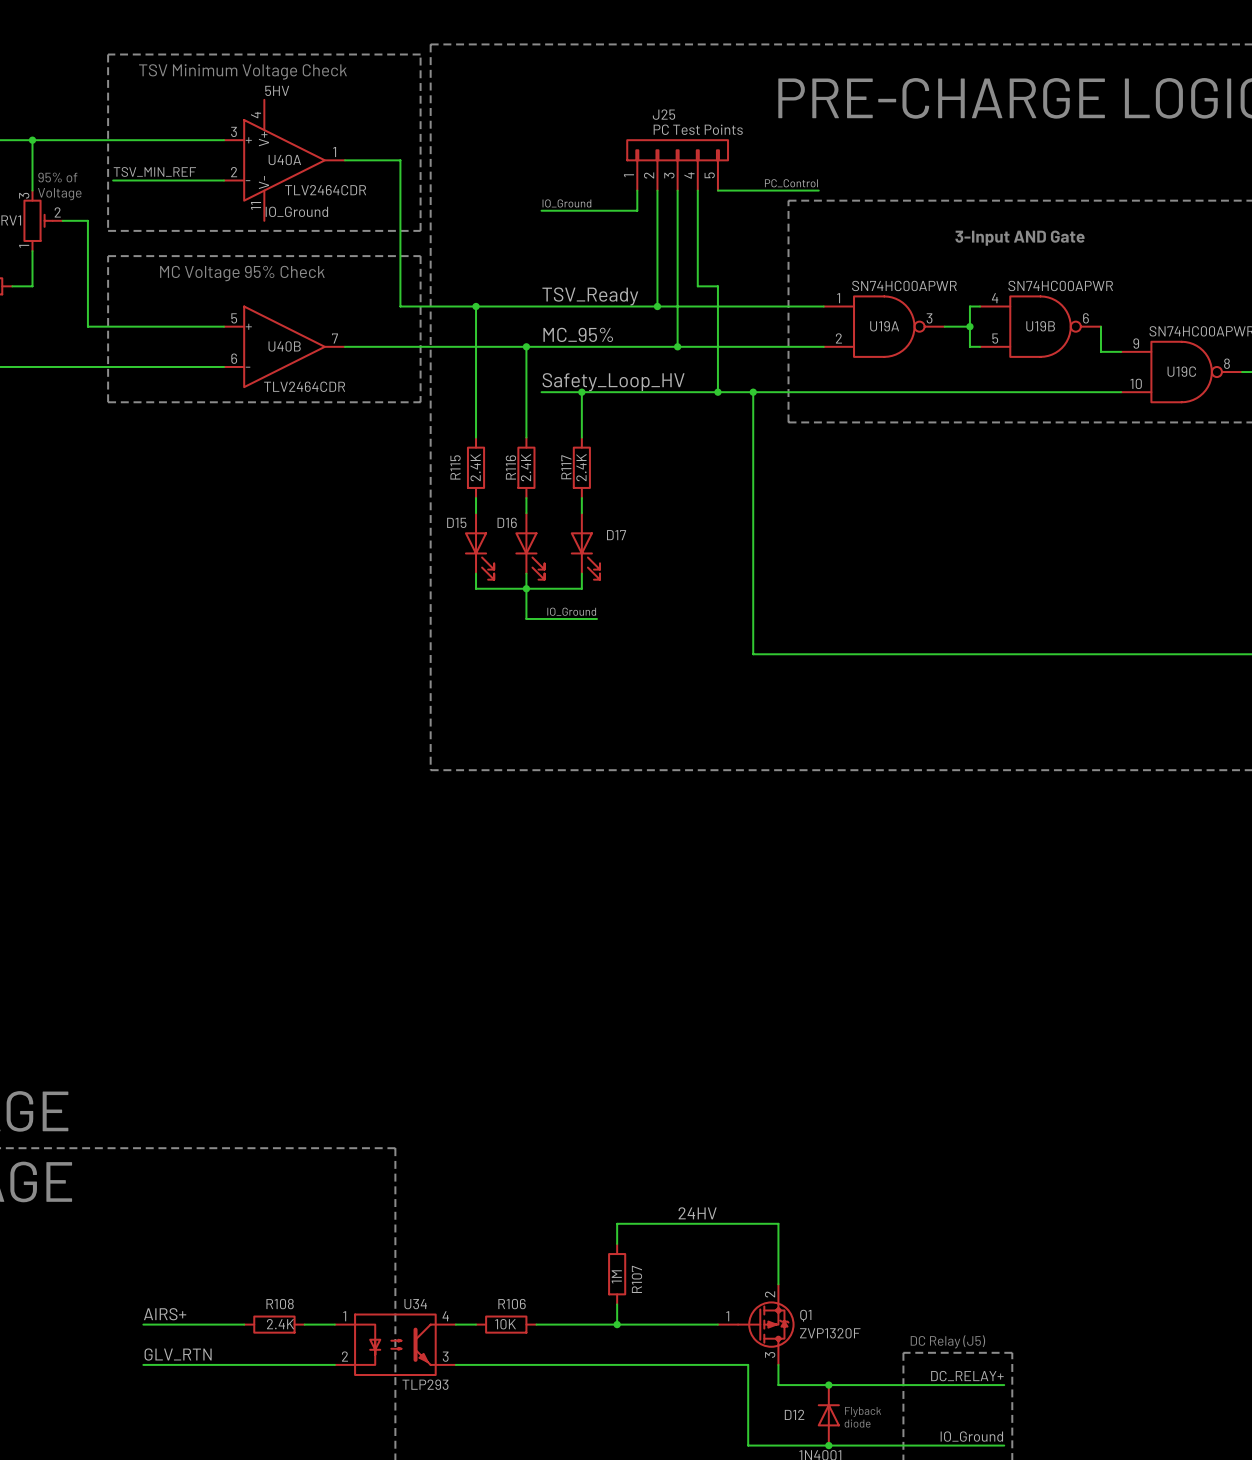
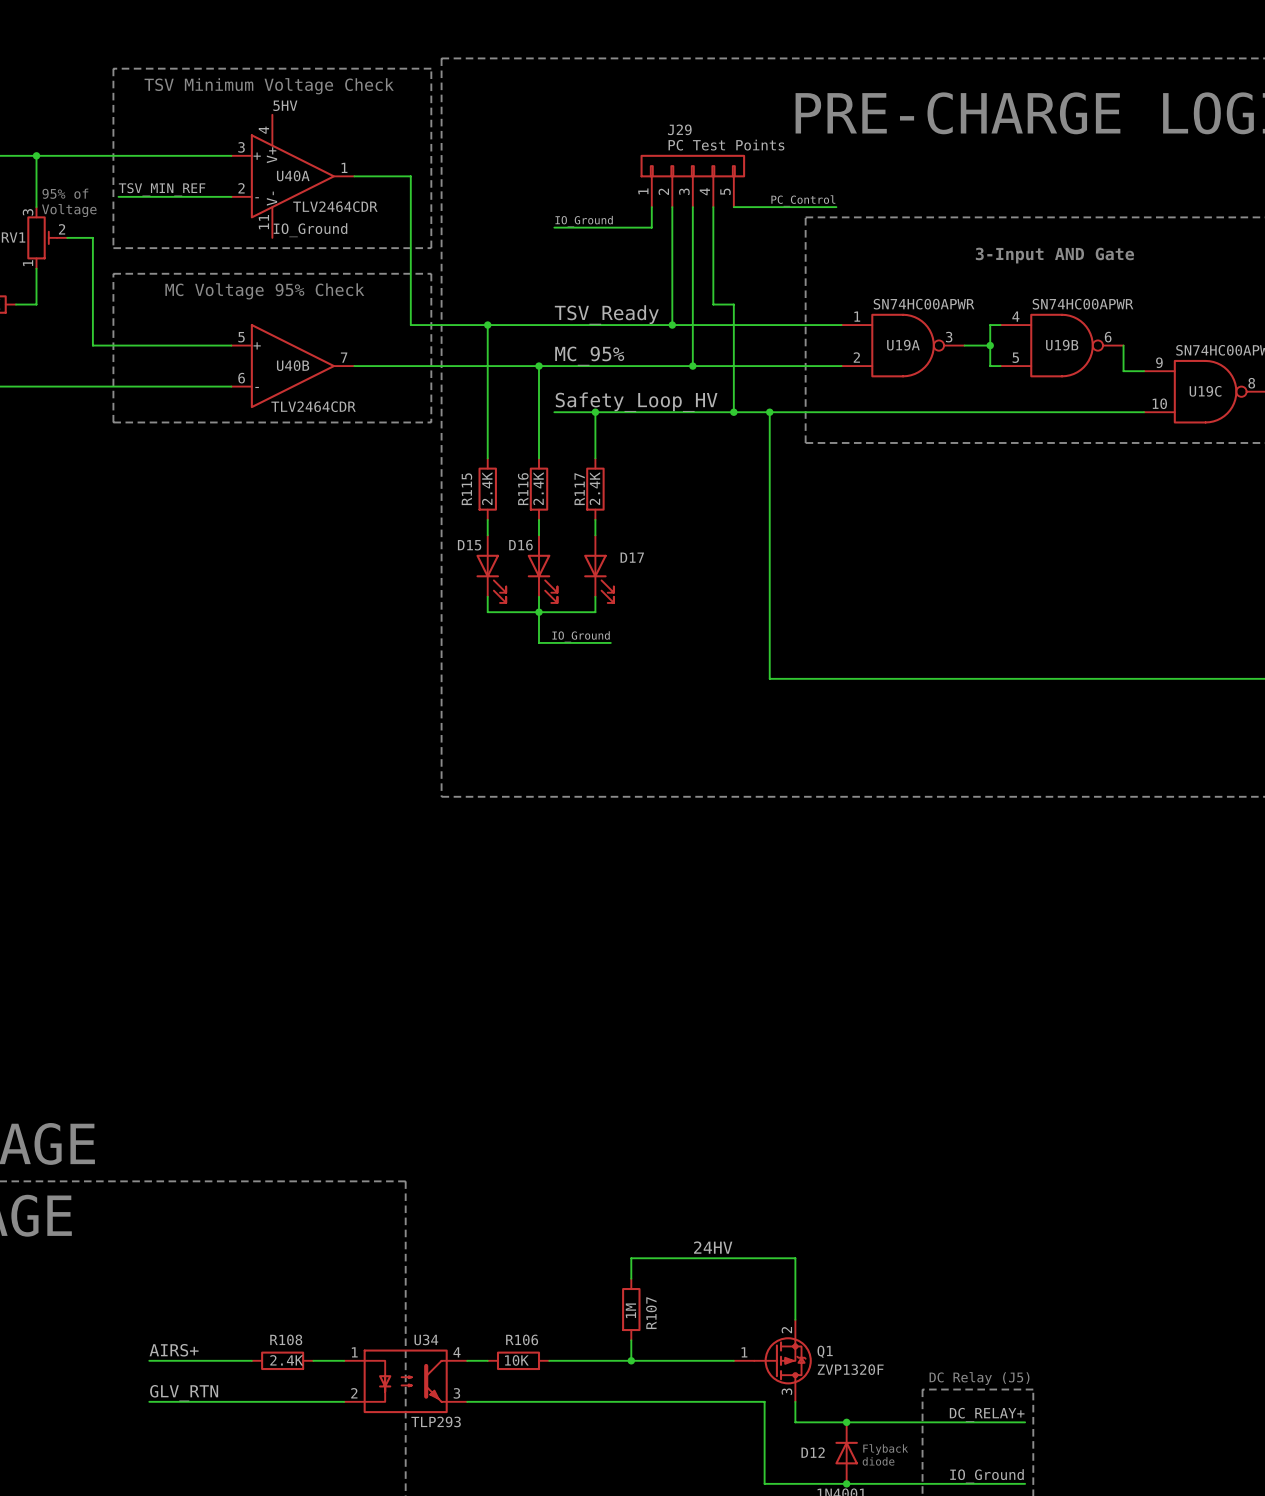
J25 name: J25 (663, 114) -> J29 (679, 129)

